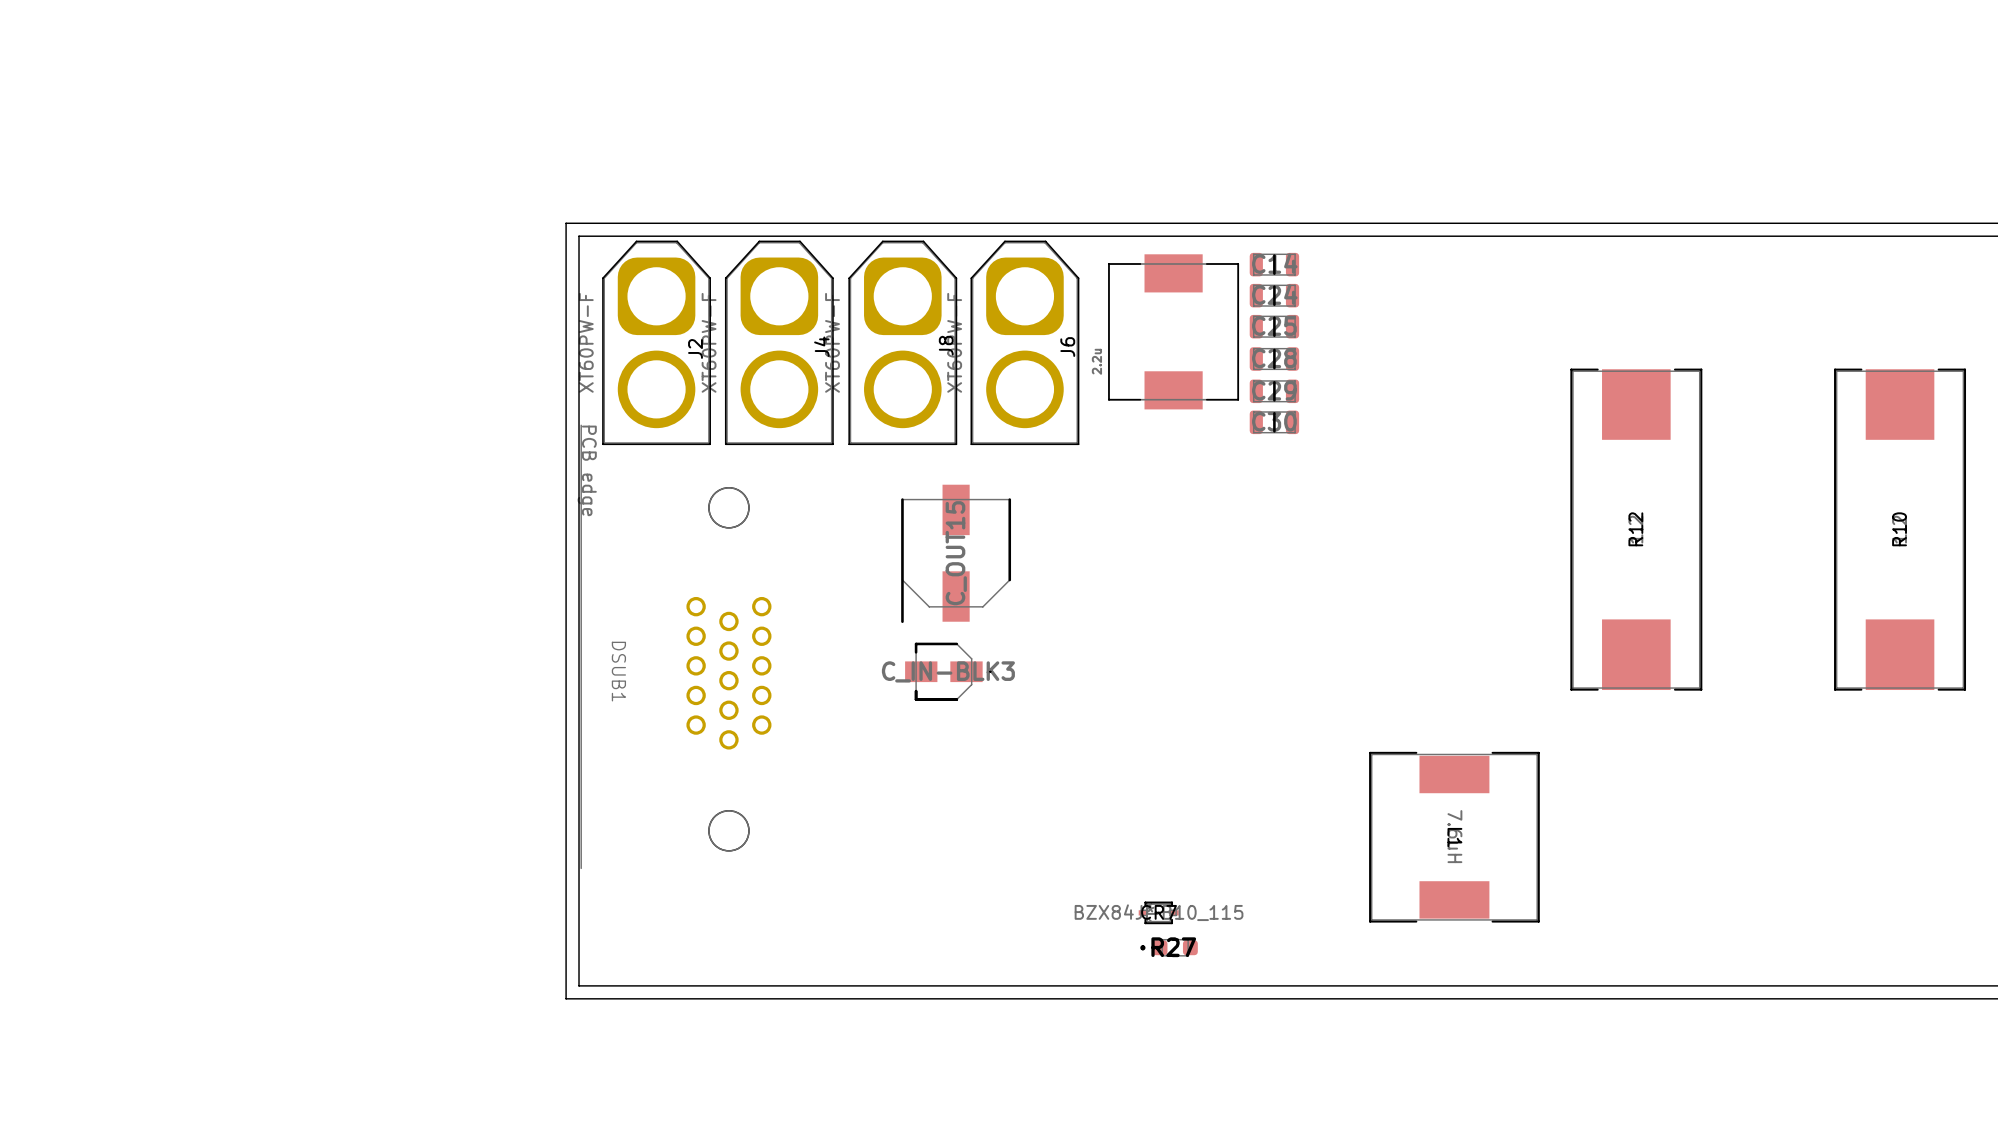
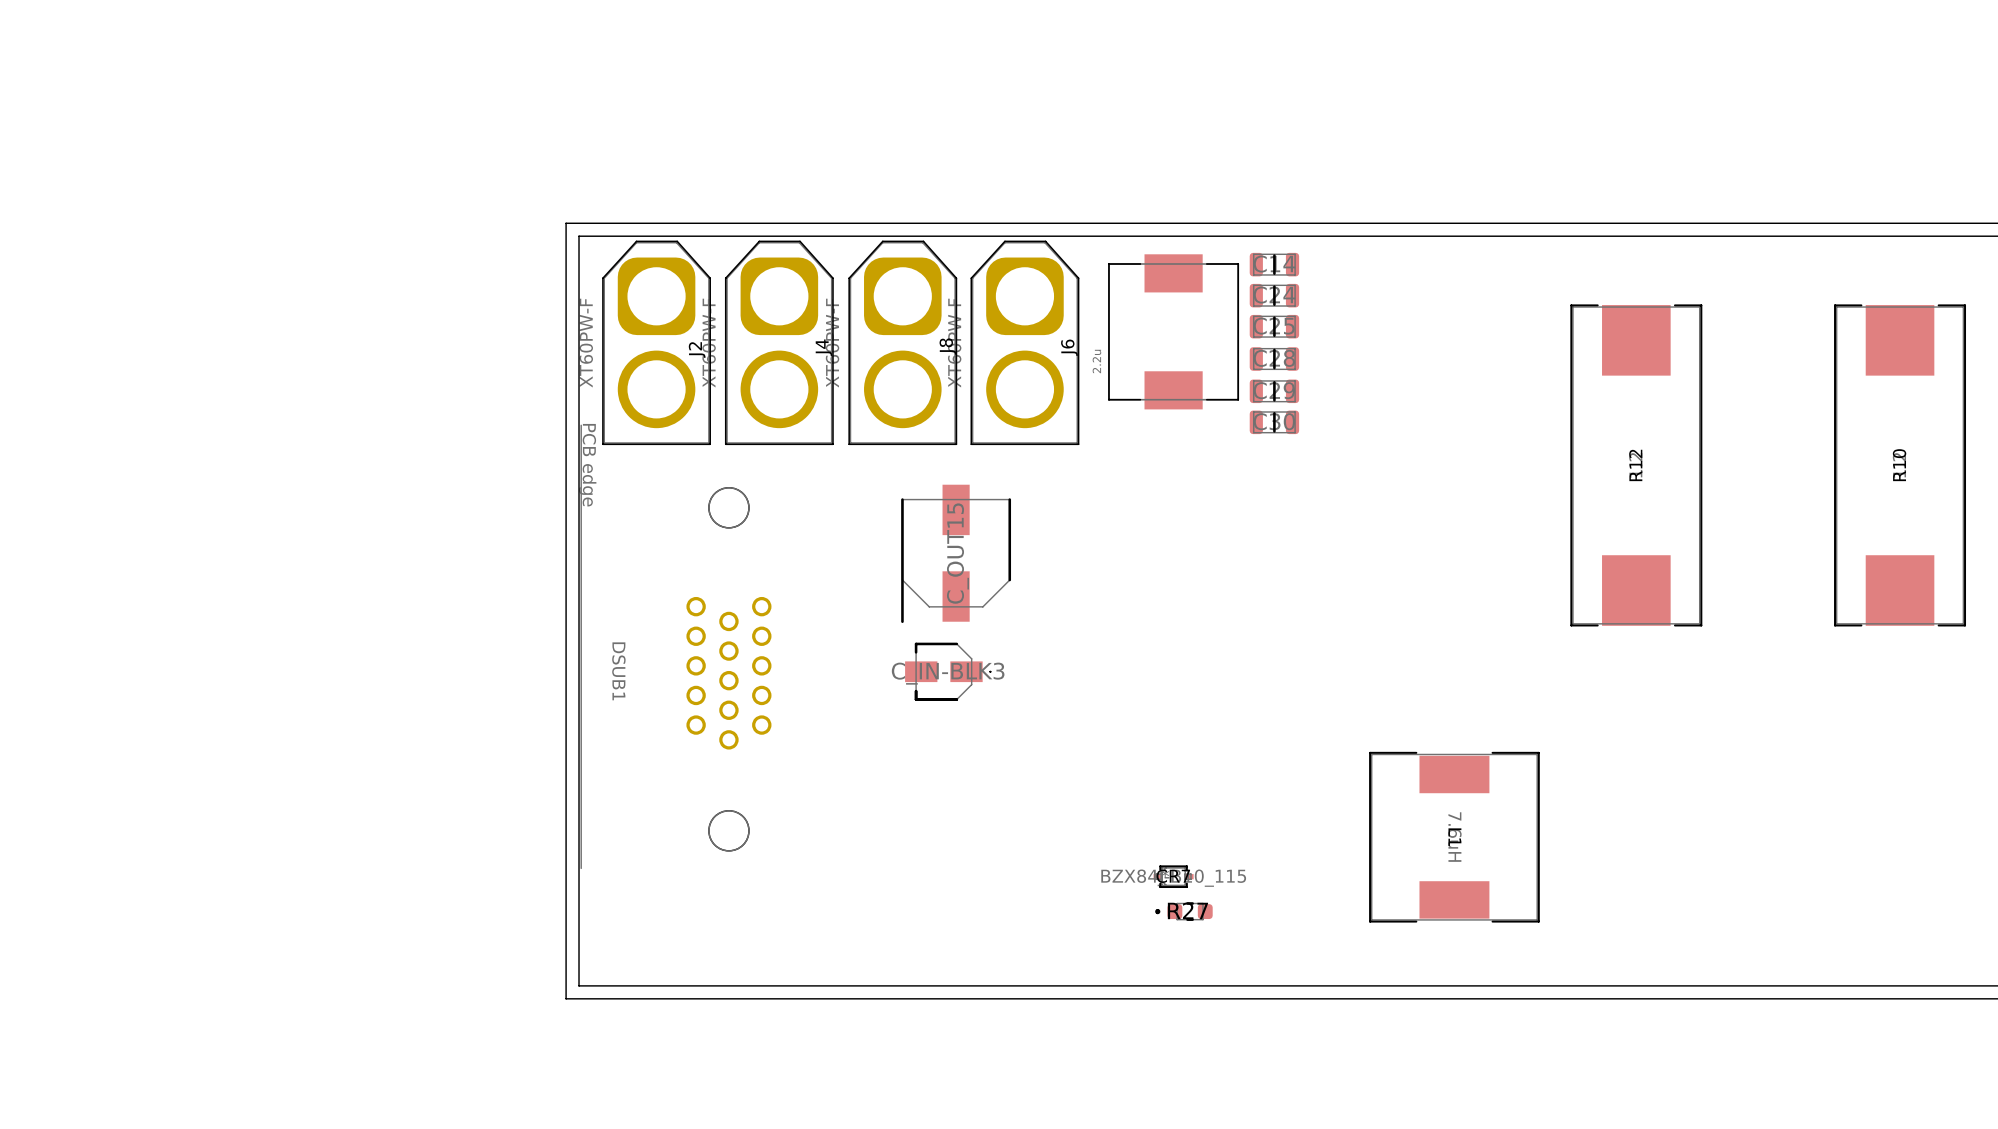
R12 position: (1636, 529) -> (1636, 465)
R10 position: (1900, 529) -> (1900, 465)
CR7 position: (1158, 912) -> (1173, 876)
R27 position: (1169, 947) -> (1183, 911)

